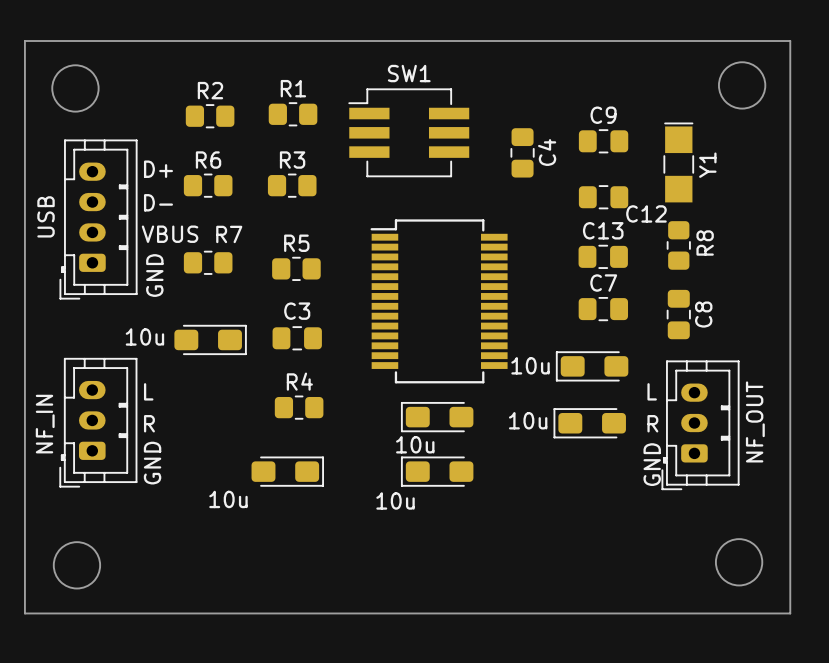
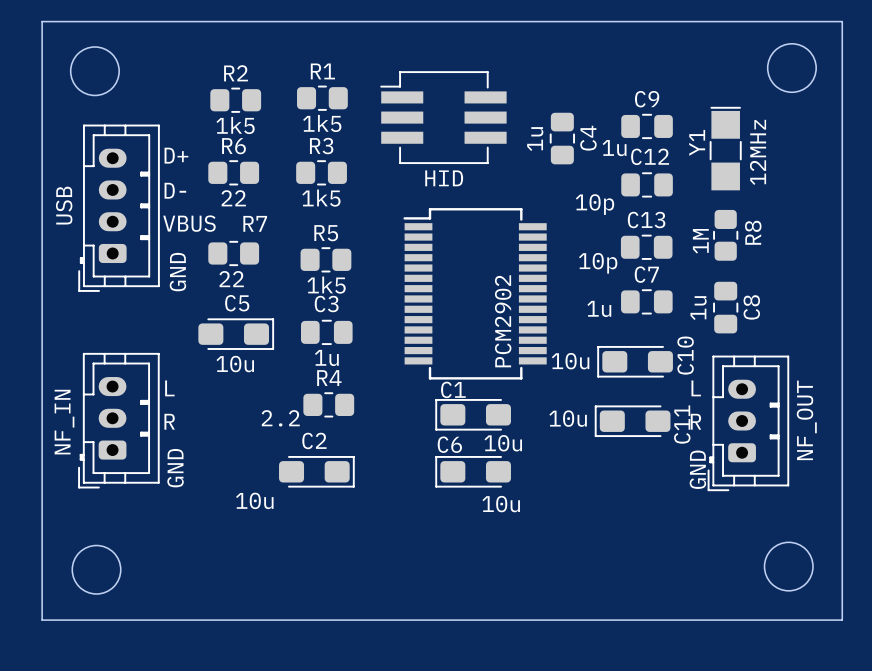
SW1 name: SW1 (409, 73) -> none
R1 value: none -> 1k5 (322, 123)
R2 value: none -> 1k5 (235, 125)
C4 value: none -> 1u (535, 139)
C9 value: none -> 1u (614, 148)
Y1 name position: Y1 (707, 165) -> Y1 (697, 142)
Y1 value: none -> 12MHz (758, 152)
SW1 value: none -> HID (444, 178)
R6 value: none -> 22 (233, 198)
R3 value: none -> 1k5 (321, 198)
C12 name position: C12 (646, 213) -> C12 (650, 156)
C12 value: none -> 10p (594, 204)
R8 value: none -> 1M (700, 241)
C13 value: none -> 10p (598, 263)
R7 value: none -> 22 (231, 279)
R5 value: none -> 1k5 (326, 285)
C5 name: none -> C5 (237, 303)
C8 value: none -> 1u (698, 308)
C7 value: none -> 1u (599, 308)
part value: none -> PCM2902 (503, 321)
C5 value position: 10u (144, 336) -> 10u (235, 364)
C10 name: none -> C10 (685, 355)
C3 value: none -> 1u (326, 357)
C1 name: none -> C1 (453, 389)
R4 value: none -> 2.2 (280, 418)
C11 name: none -> C11 (682, 424)
C2 name: none -> C2 (314, 440)
C1 value position: 10u (415, 444) -> 10u (503, 443)
C6 name: none -> C6 (449, 444)
C6 value position: 10u (395, 500) -> 10u (501, 504)

